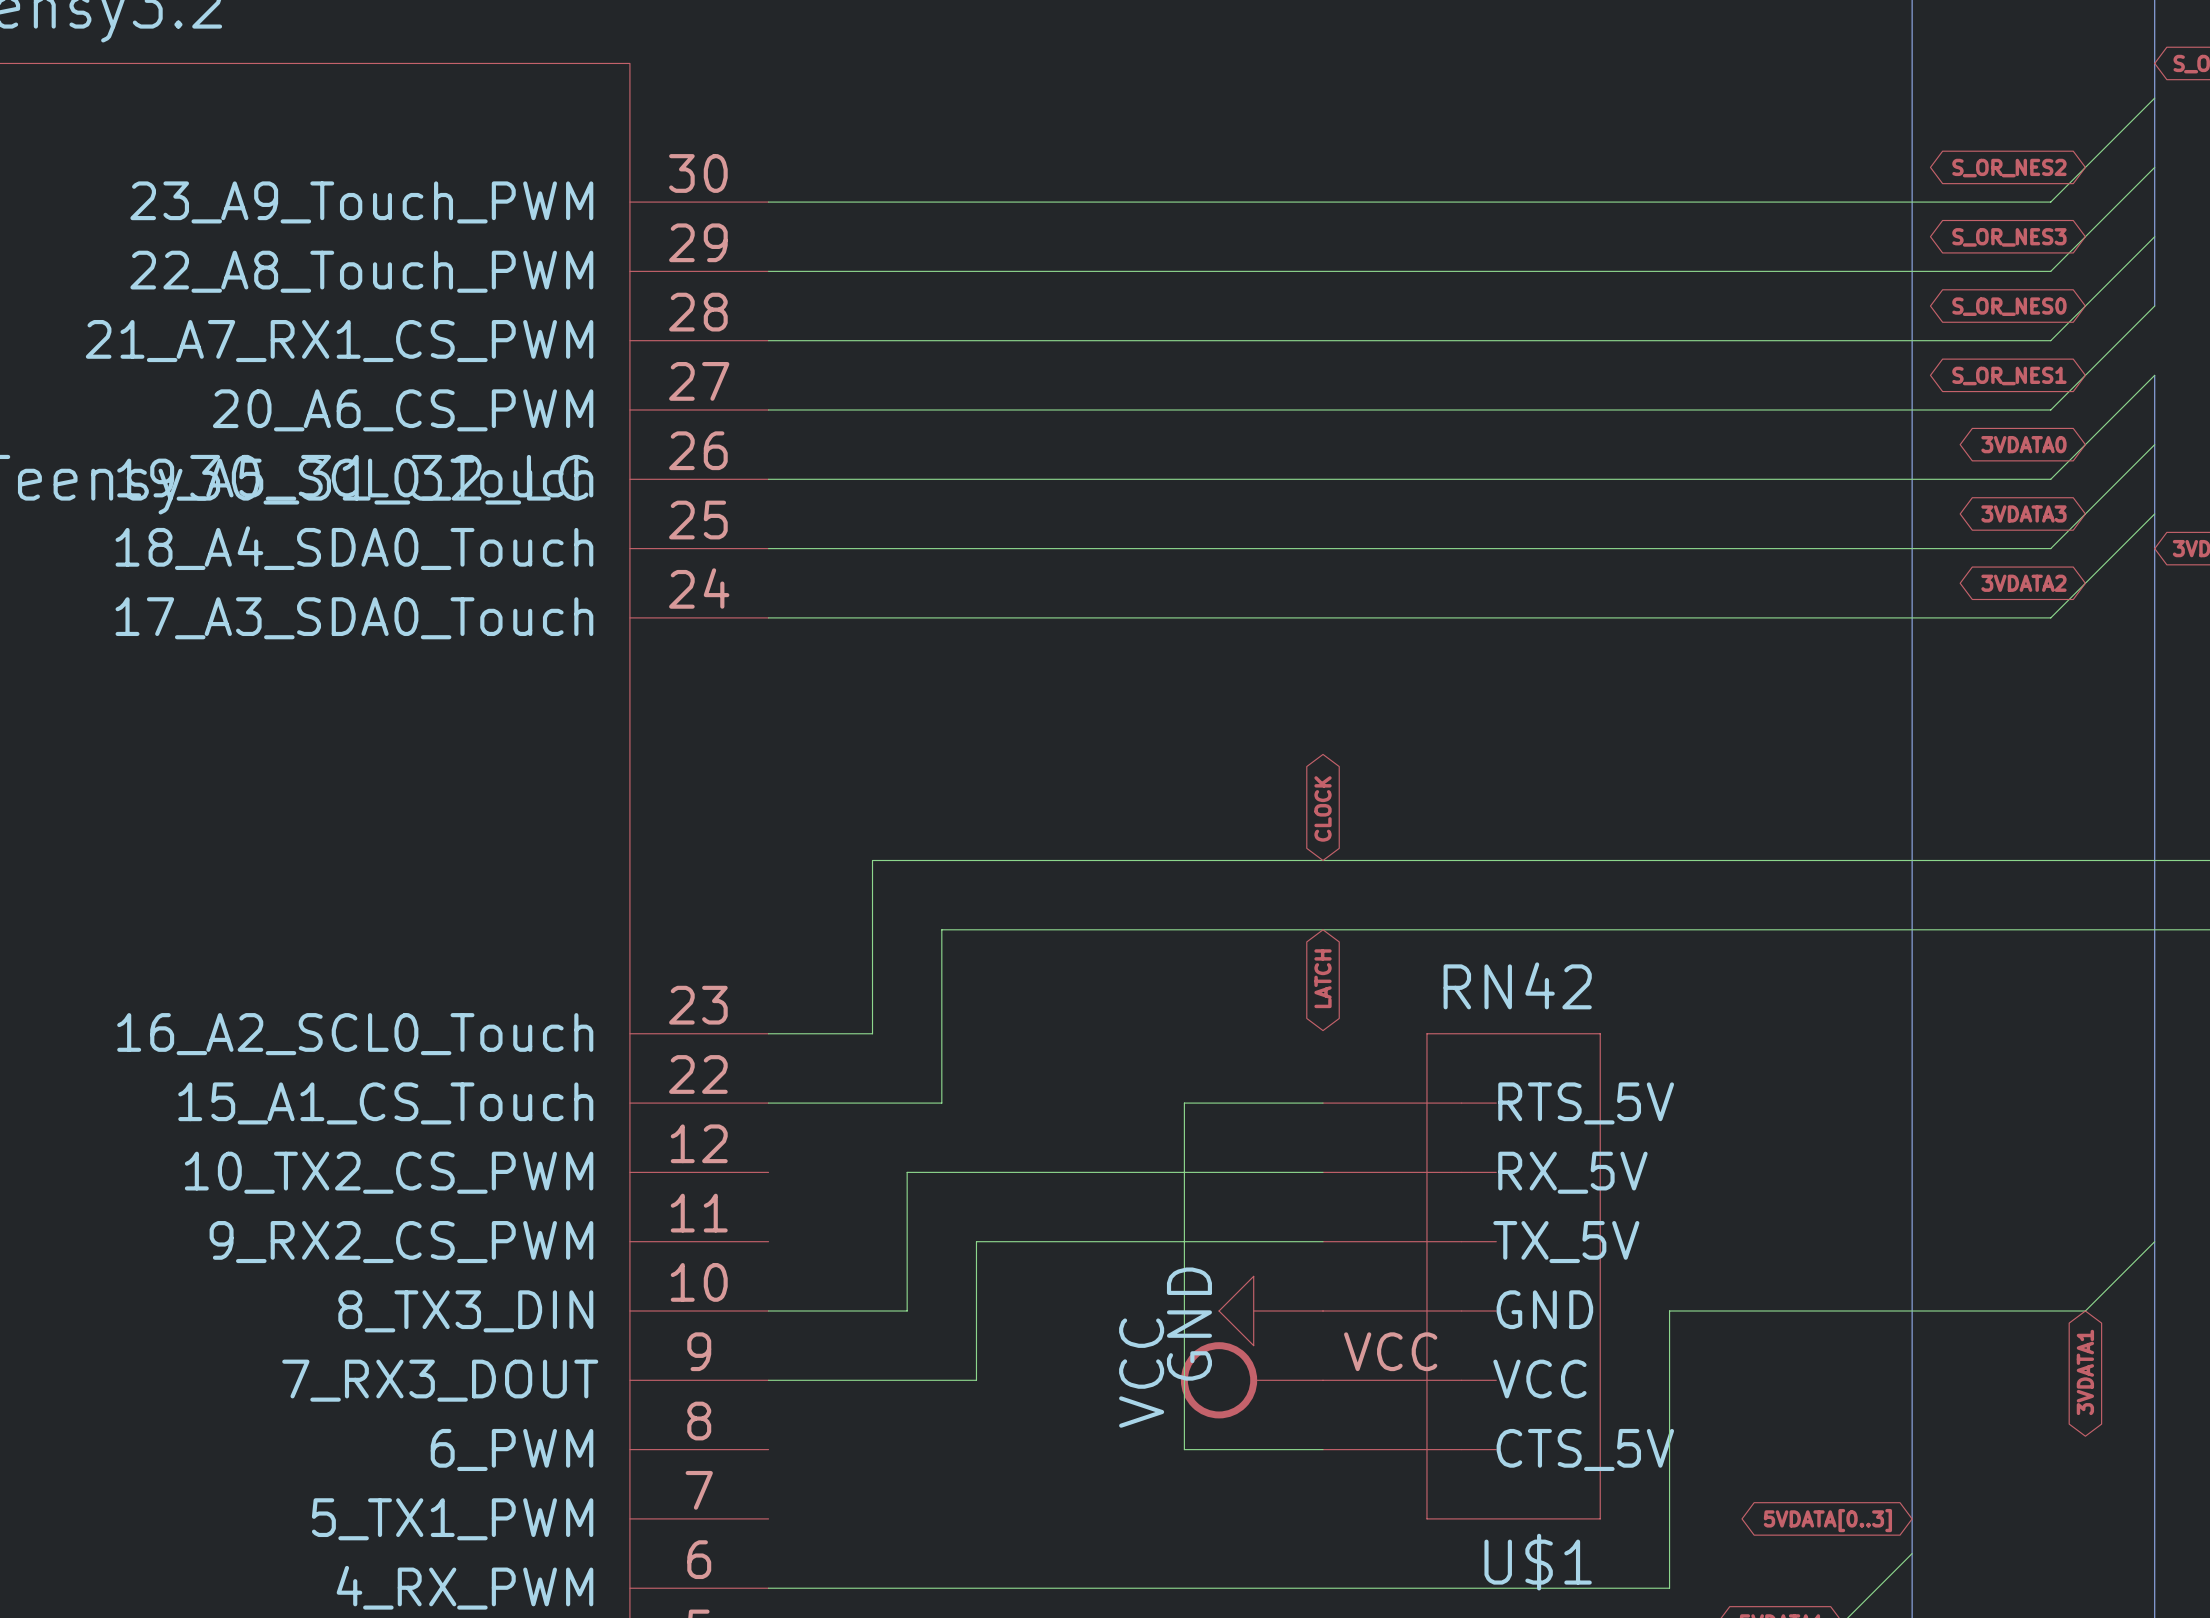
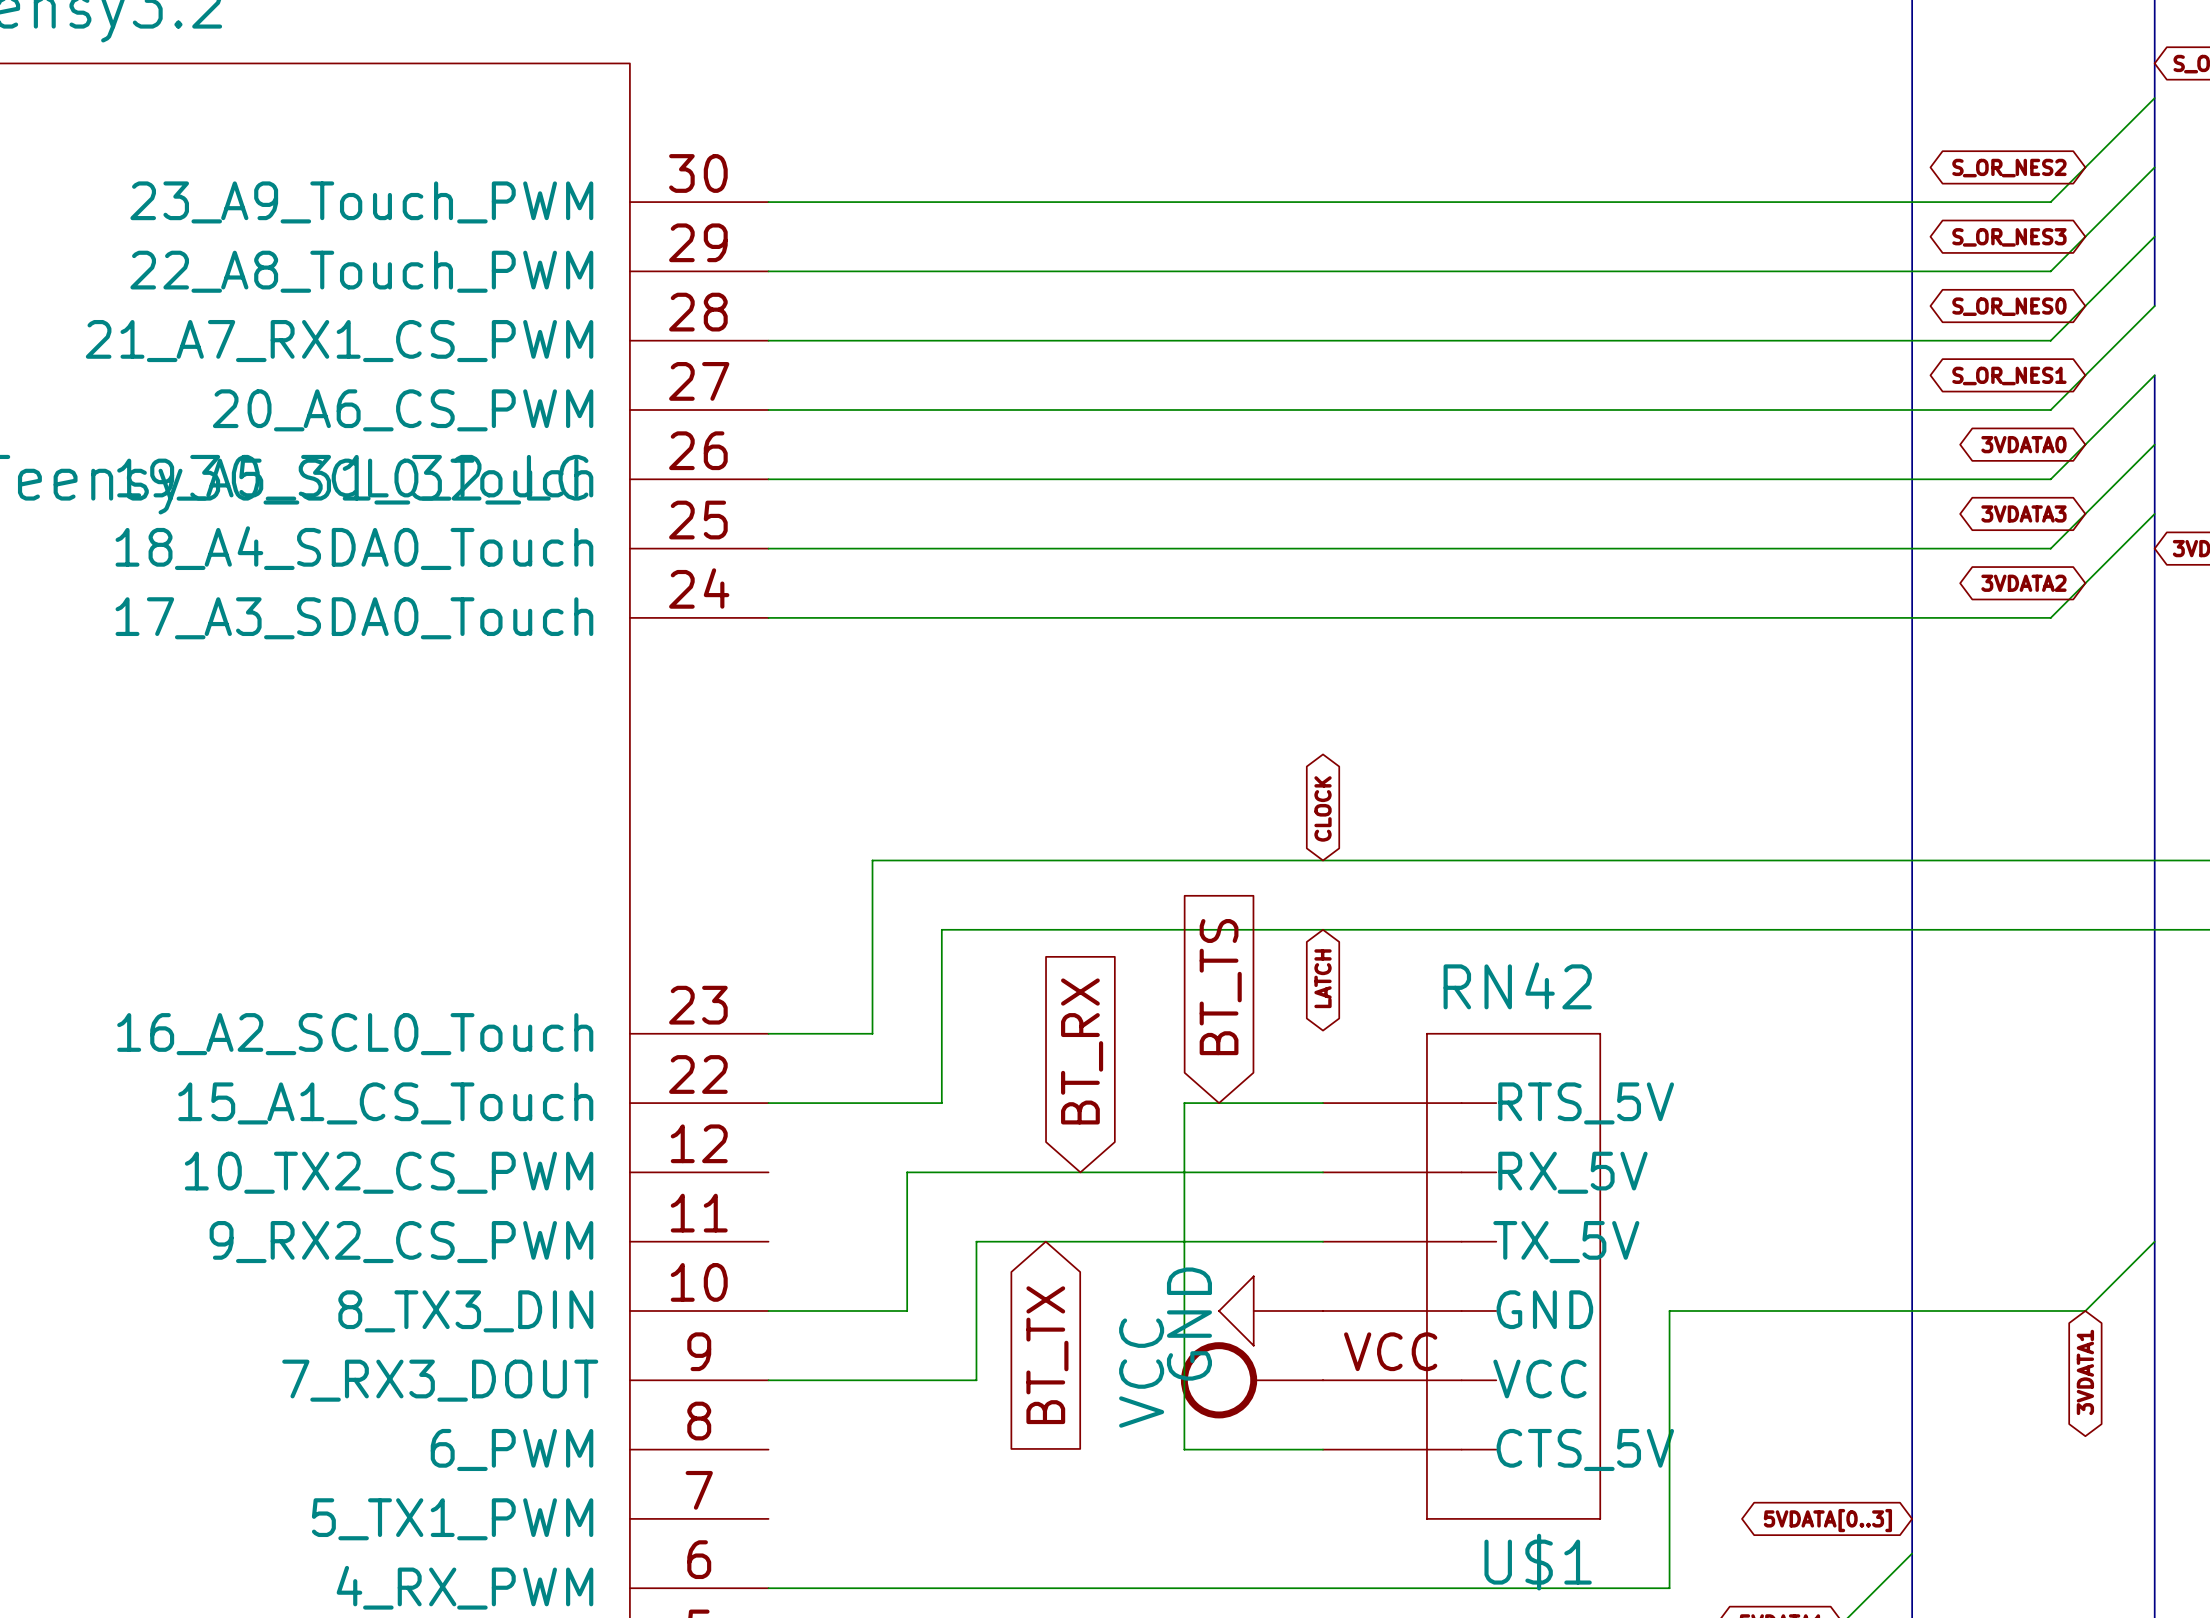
global label: none -> BT_TS (1220, 987)
global label: none -> BT_RX (1082, 1051)
global label: none -> BT_TX (1047, 1355)

